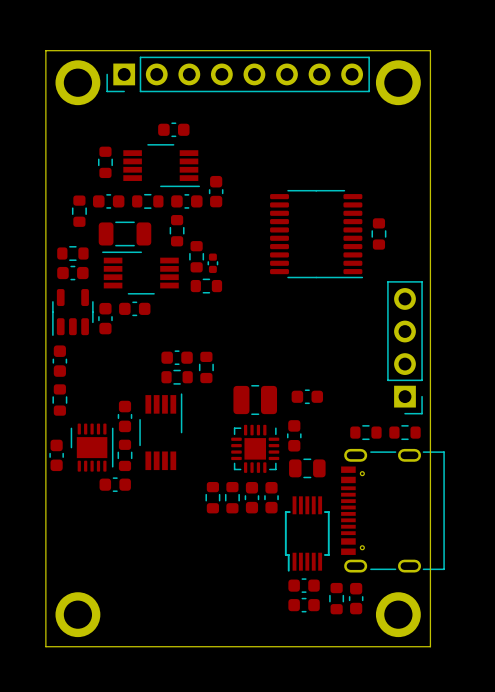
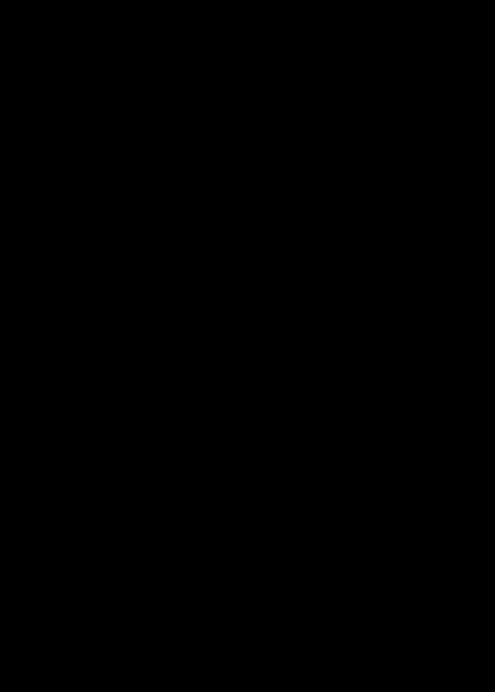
board edge: (45, 50) (430, 50) (430, 646) (45, 646) (45, 50) -> none
part: (238, 74) -> none
part: (77, 82) -> none
part: (398, 82) -> none
part: (173, 129) -> none
part: (105, 162) -> none
part: (161, 165) -> none
part: (216, 191) -> none
part: (108, 201) -> none
part: (147, 201) -> none
part: (186, 201) -> none
part: (79, 211) -> none
part: (177, 230) -> none
part: (124, 233) -> none
part: (378, 233) -> none
part: (316, 234) -> none
part: (72, 253) -> none
part: (196, 256) -> none
part: (212, 263) -> none
part: (72, 273) -> none
part: (140, 273) -> none
part: (206, 286) -> none
part: (134, 308) -> none
part: (72, 312) -> none
part: (105, 318) -> none
part: (404, 347) -> none
part: (177, 357) -> none
part: (59, 361) -> none
part: (206, 367) -> none
part: (177, 377) -> none
part: (307, 396) -> none
part: (59, 400) -> none
part: (255, 400) -> none
part: (124, 416) -> none
part: (160, 431) -> none
part: (365, 432) -> none
part: (404, 432) -> none
part: (294, 435) -> none
part: (92, 447) -> none
part: (255, 448) -> none
part: (56, 455) -> none
part: (124, 455) -> none
part: (307, 468) -> none
part: (115, 484) -> none
part: (212, 497) -> none
part: (232, 497) -> none
part: (251, 497) -> none
part: (271, 497) -> none
part: (392, 510) -> none
part: (307, 533) -> none
part: (304, 585) -> none
part: (336, 598) -> none
part: (356, 598) -> none
part: (304, 605) -> none
part: (77, 614) -> none
part: (398, 614) -> none

